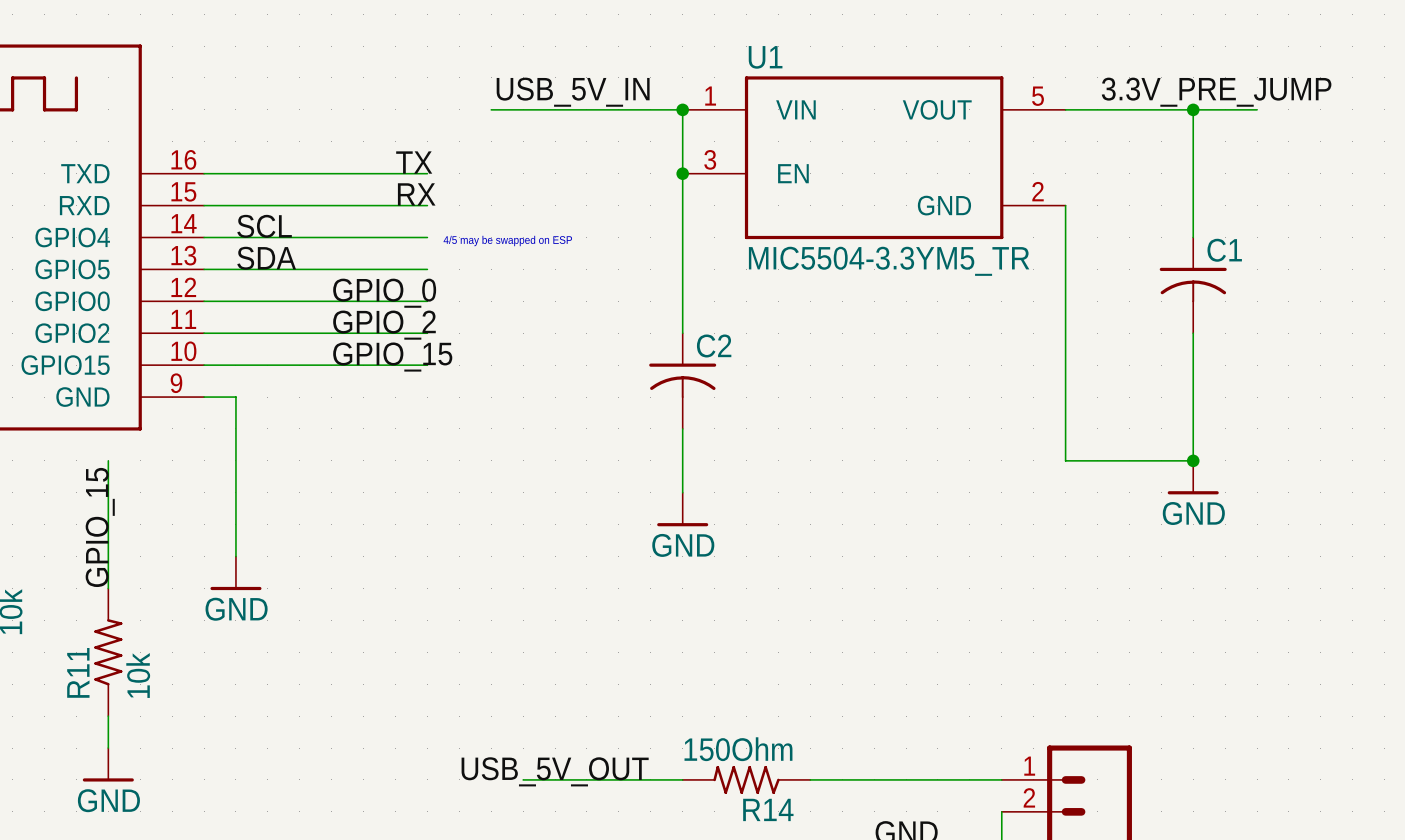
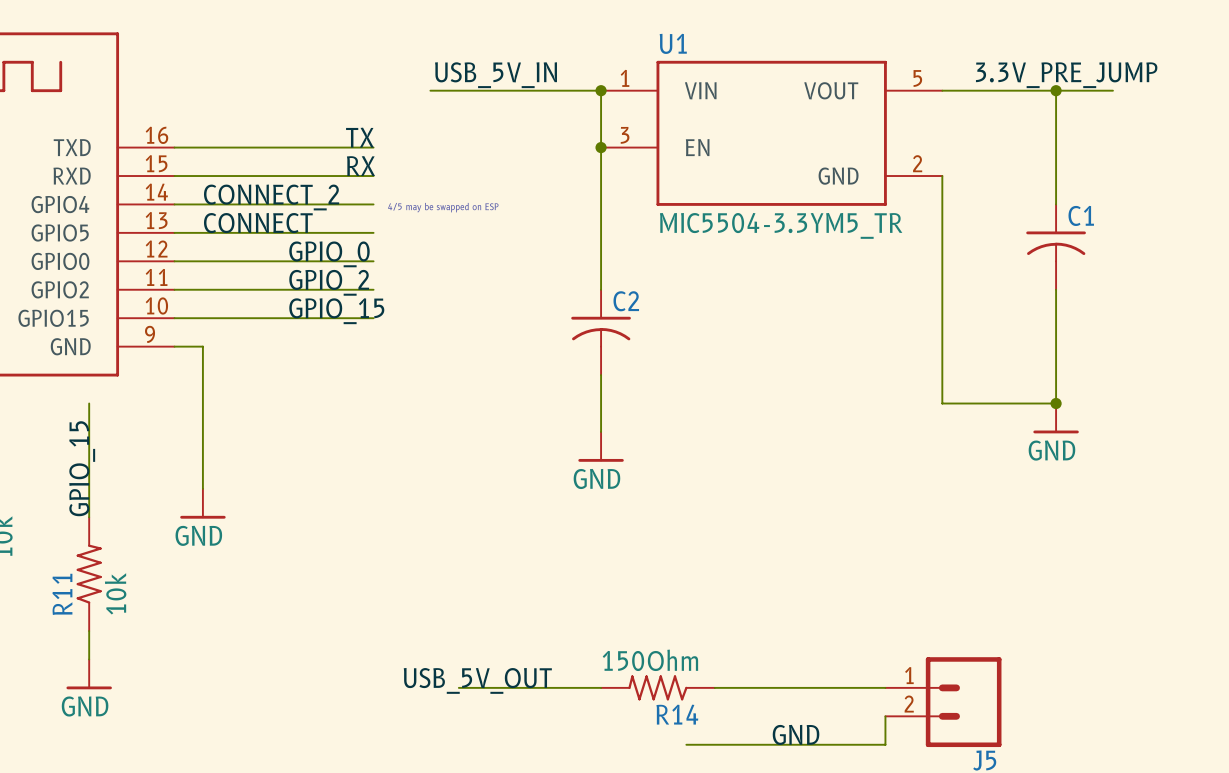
label: SCL (264, 226) -> CONNECT_2 (271, 197)
label: SDA (266, 258) -> CONNECT (258, 223)

